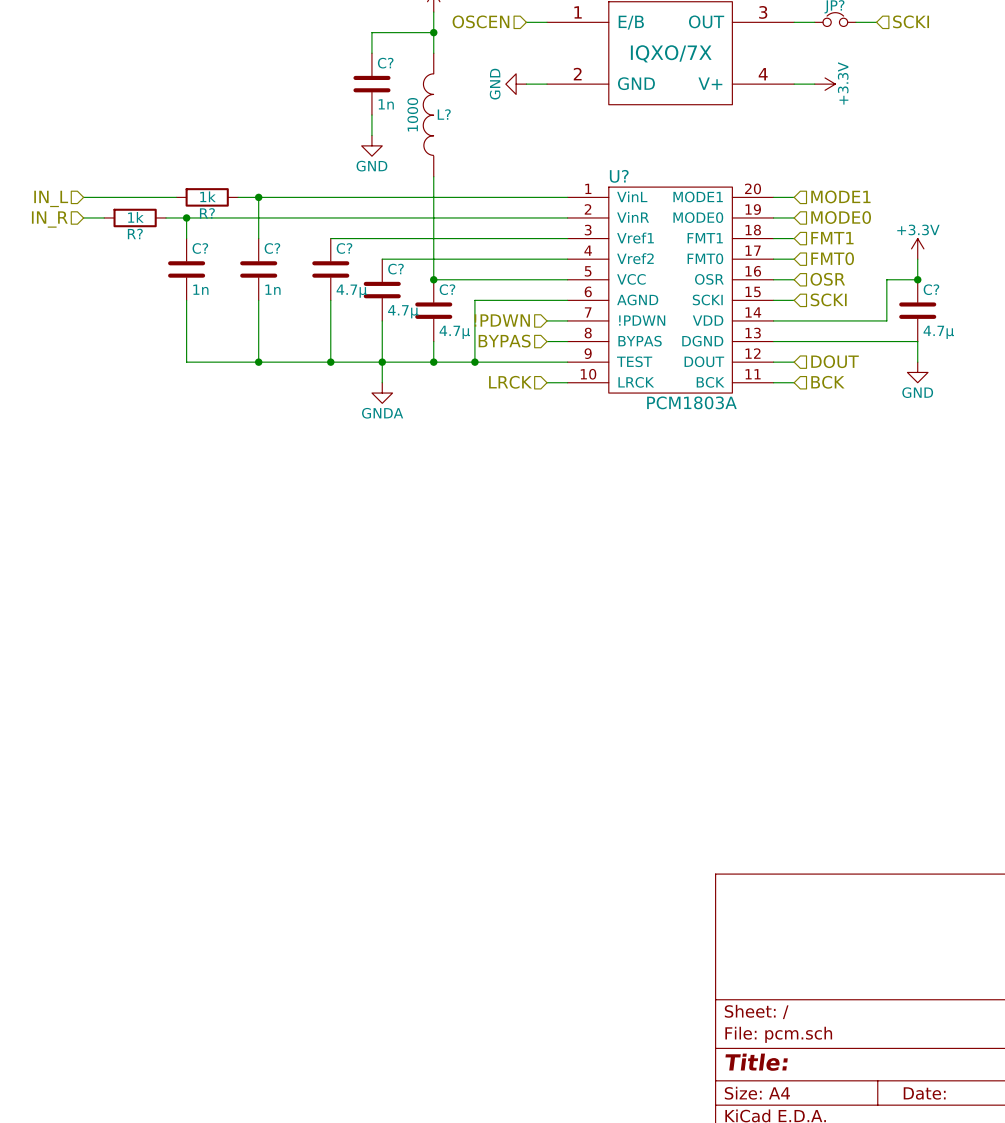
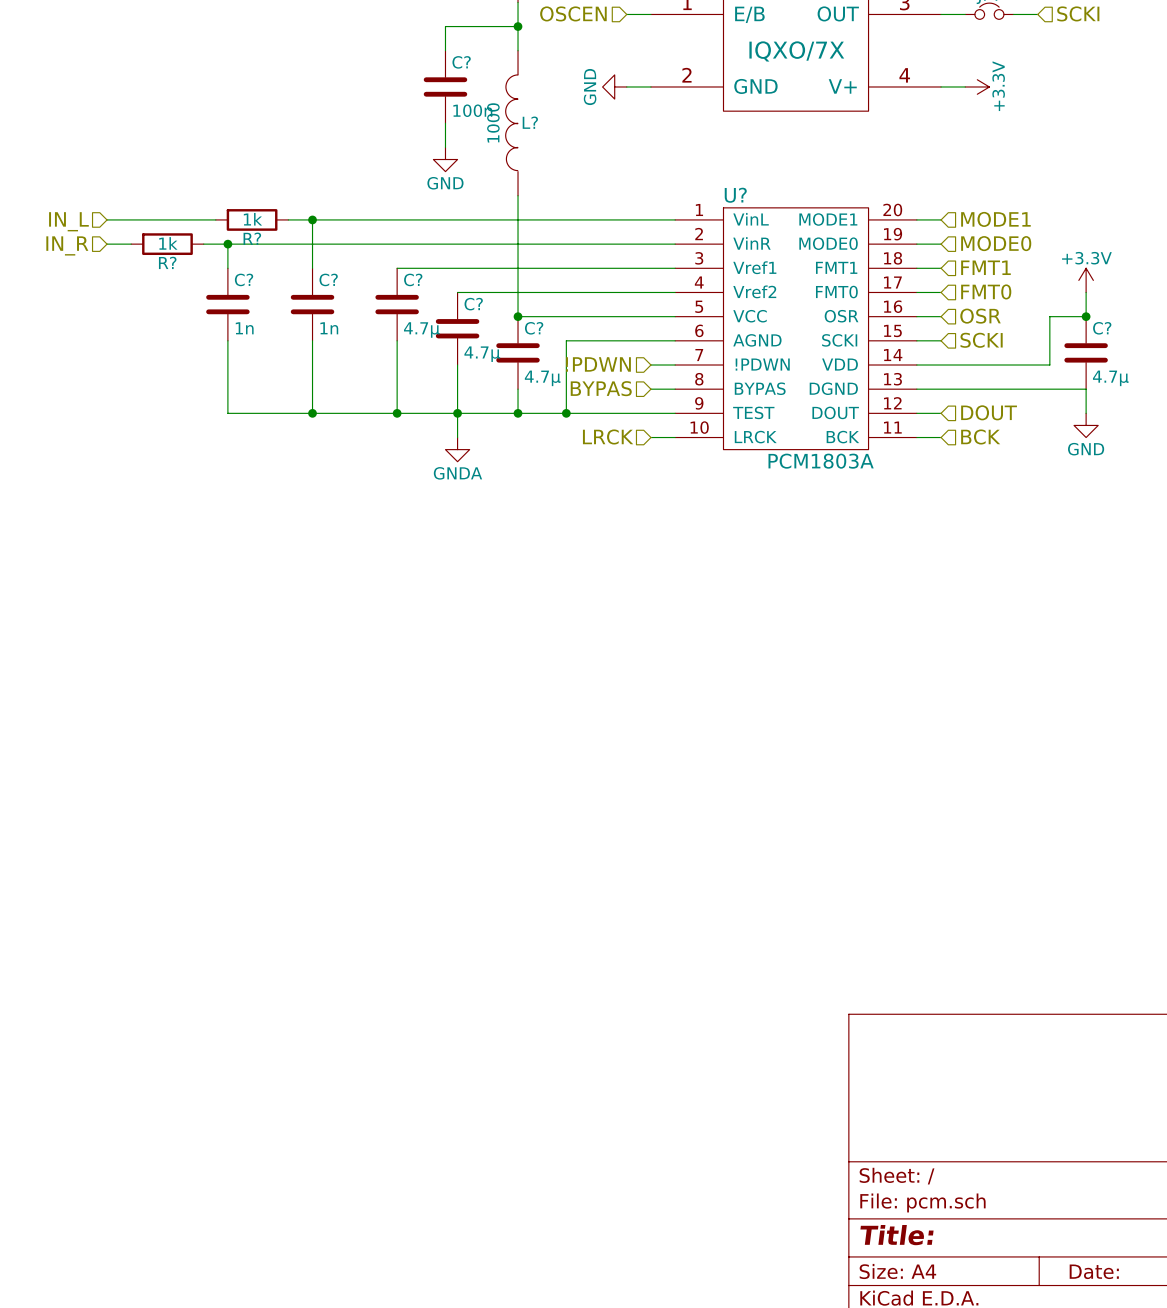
C? value: 1n (386, 104) -> 100n (472, 110)

